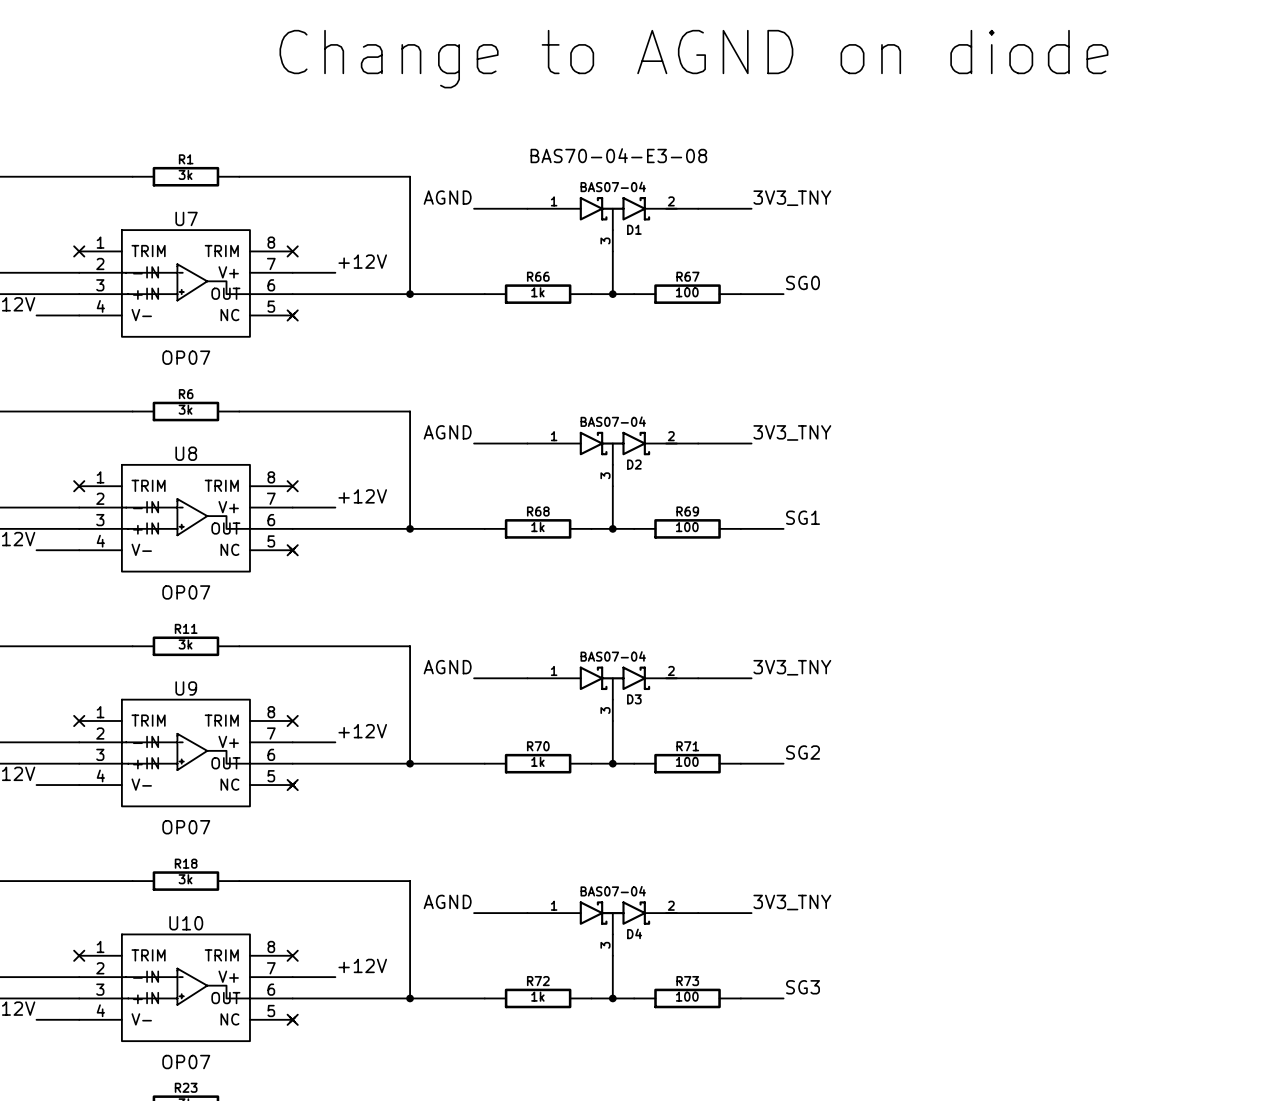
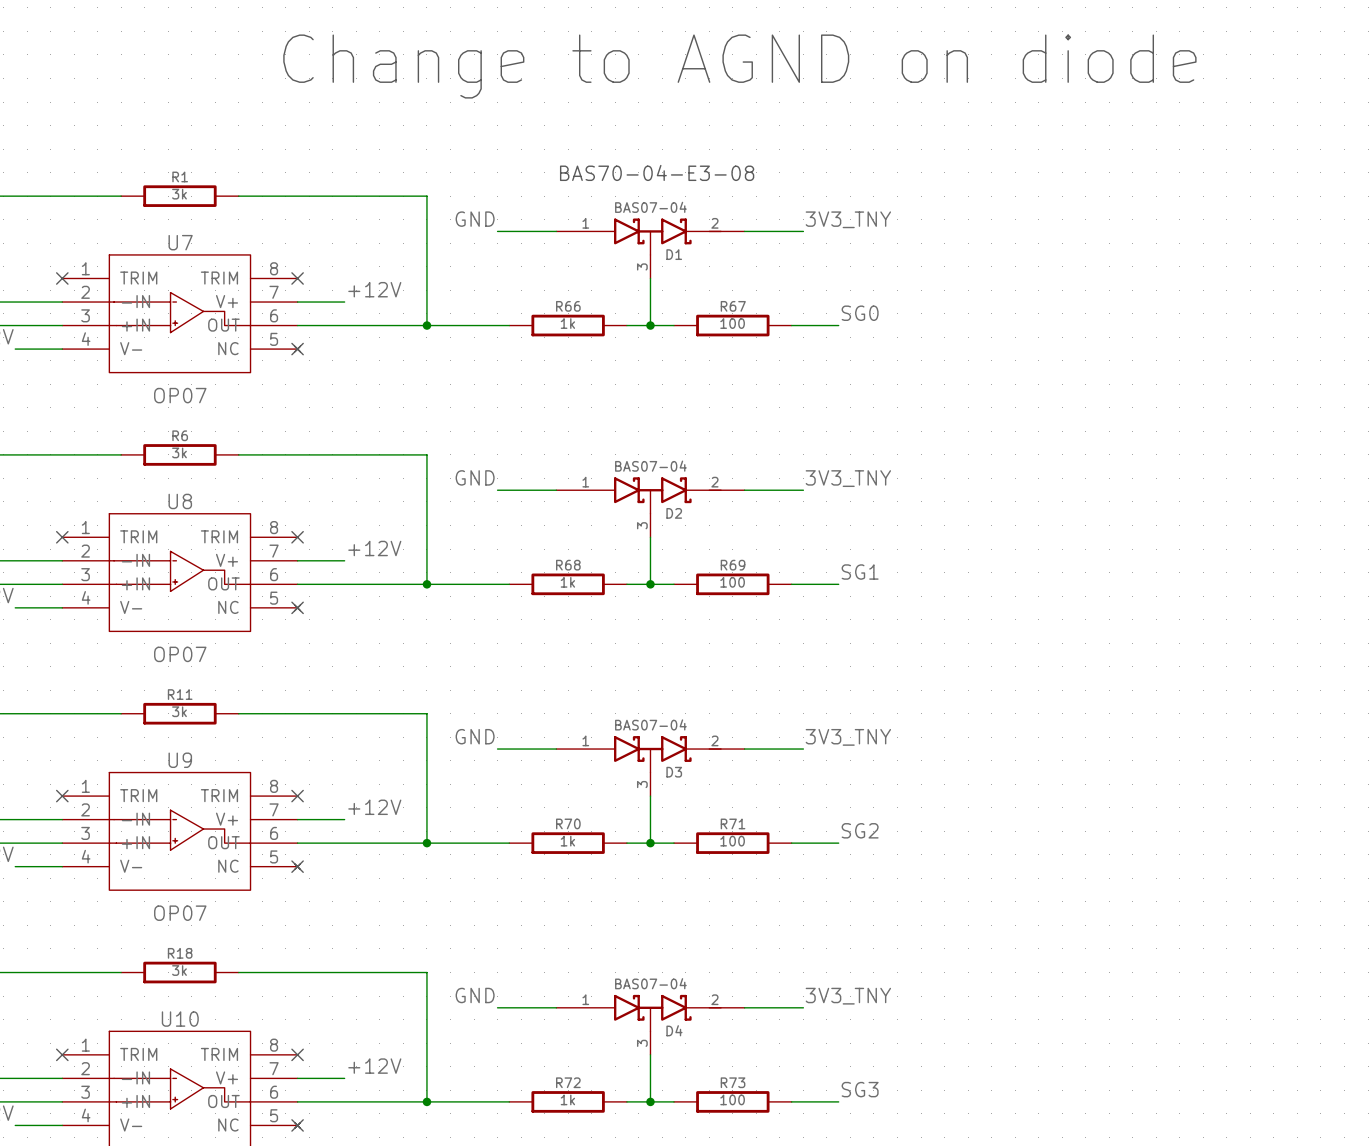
label: AGND (447, 197) -> GND (475, 219)
label: AGND (447, 432) -> GND (475, 477)
label: AGND (447, 667) -> GND (475, 736)
label: AGND (447, 901) -> GND (475, 995)

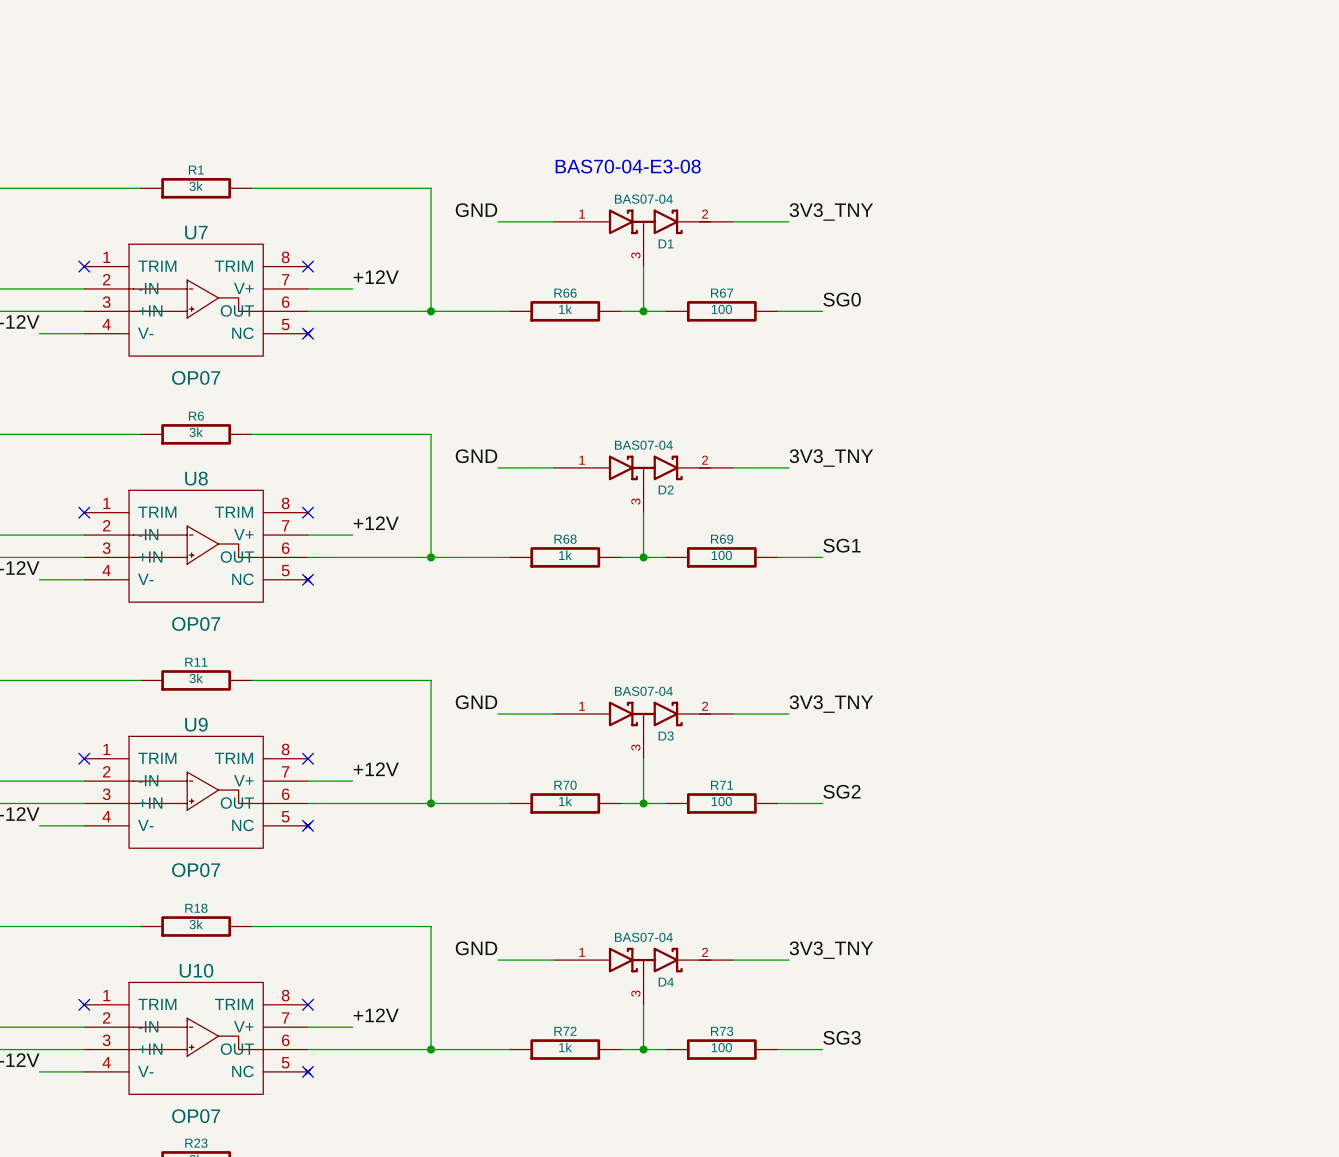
text: Change to AGND on diode (739, 66) -> none

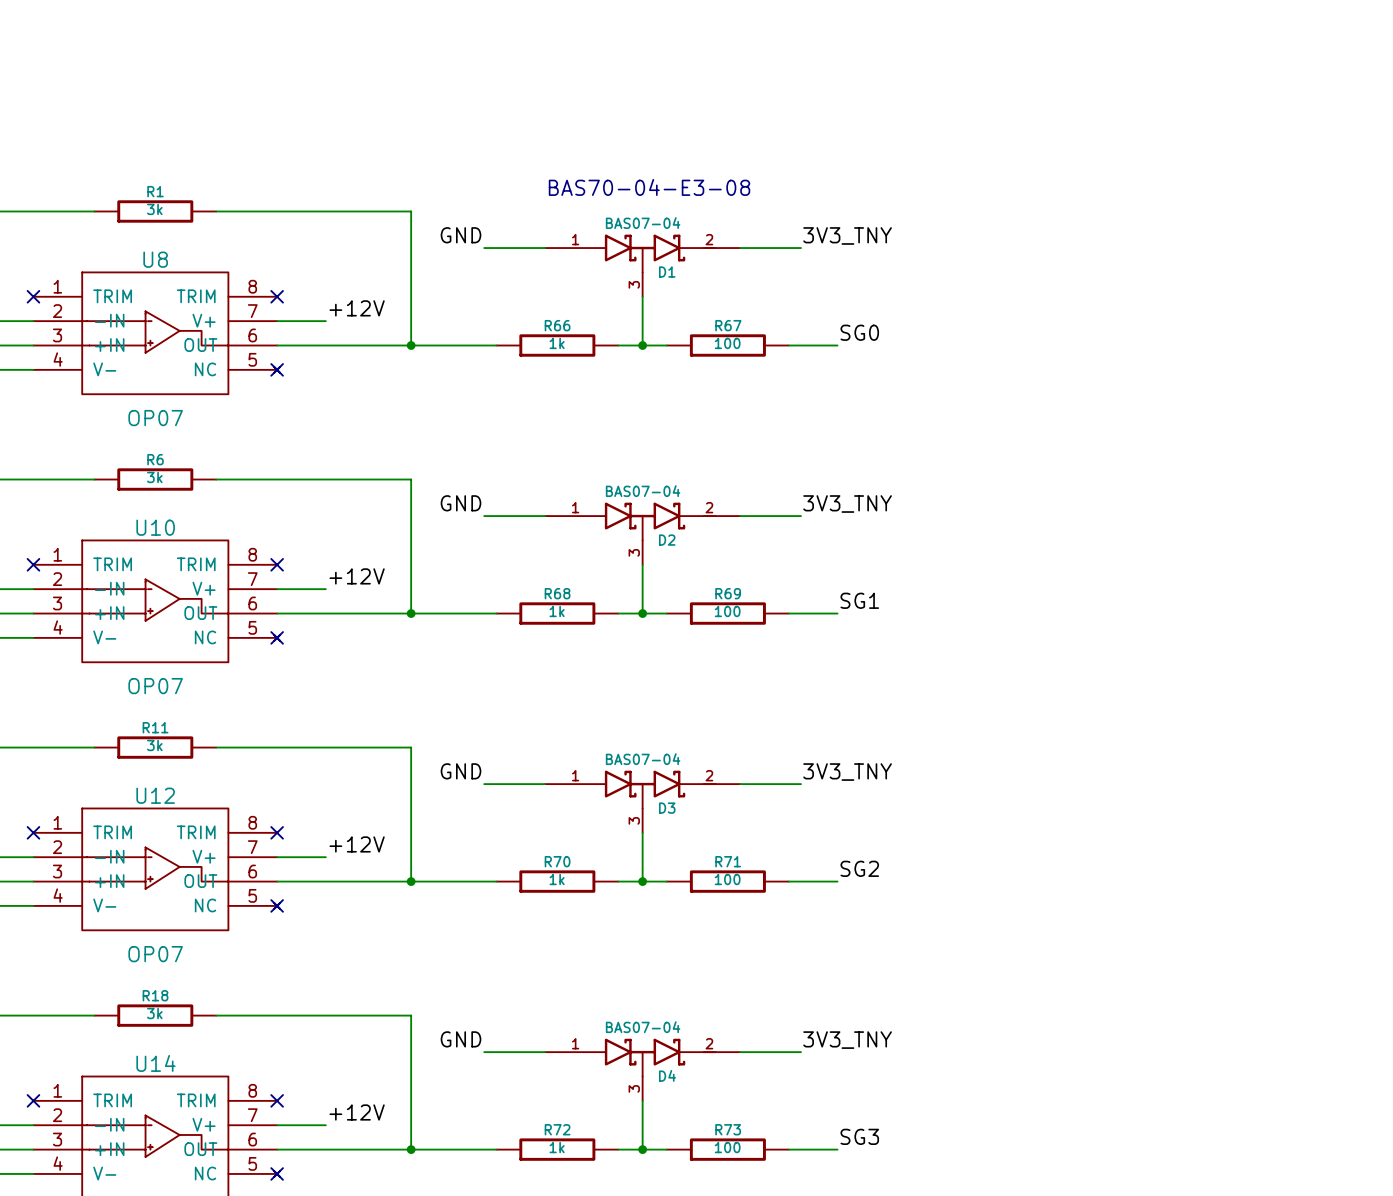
U7 name: U7 (196, 232) -> U8 (155, 259)
U8 name: U8 (196, 478) -> U10 (155, 527)
U9 name: U9 (196, 724) -> U12 (155, 795)
U10 name: U10 (196, 970) -> U14 (155, 1063)

